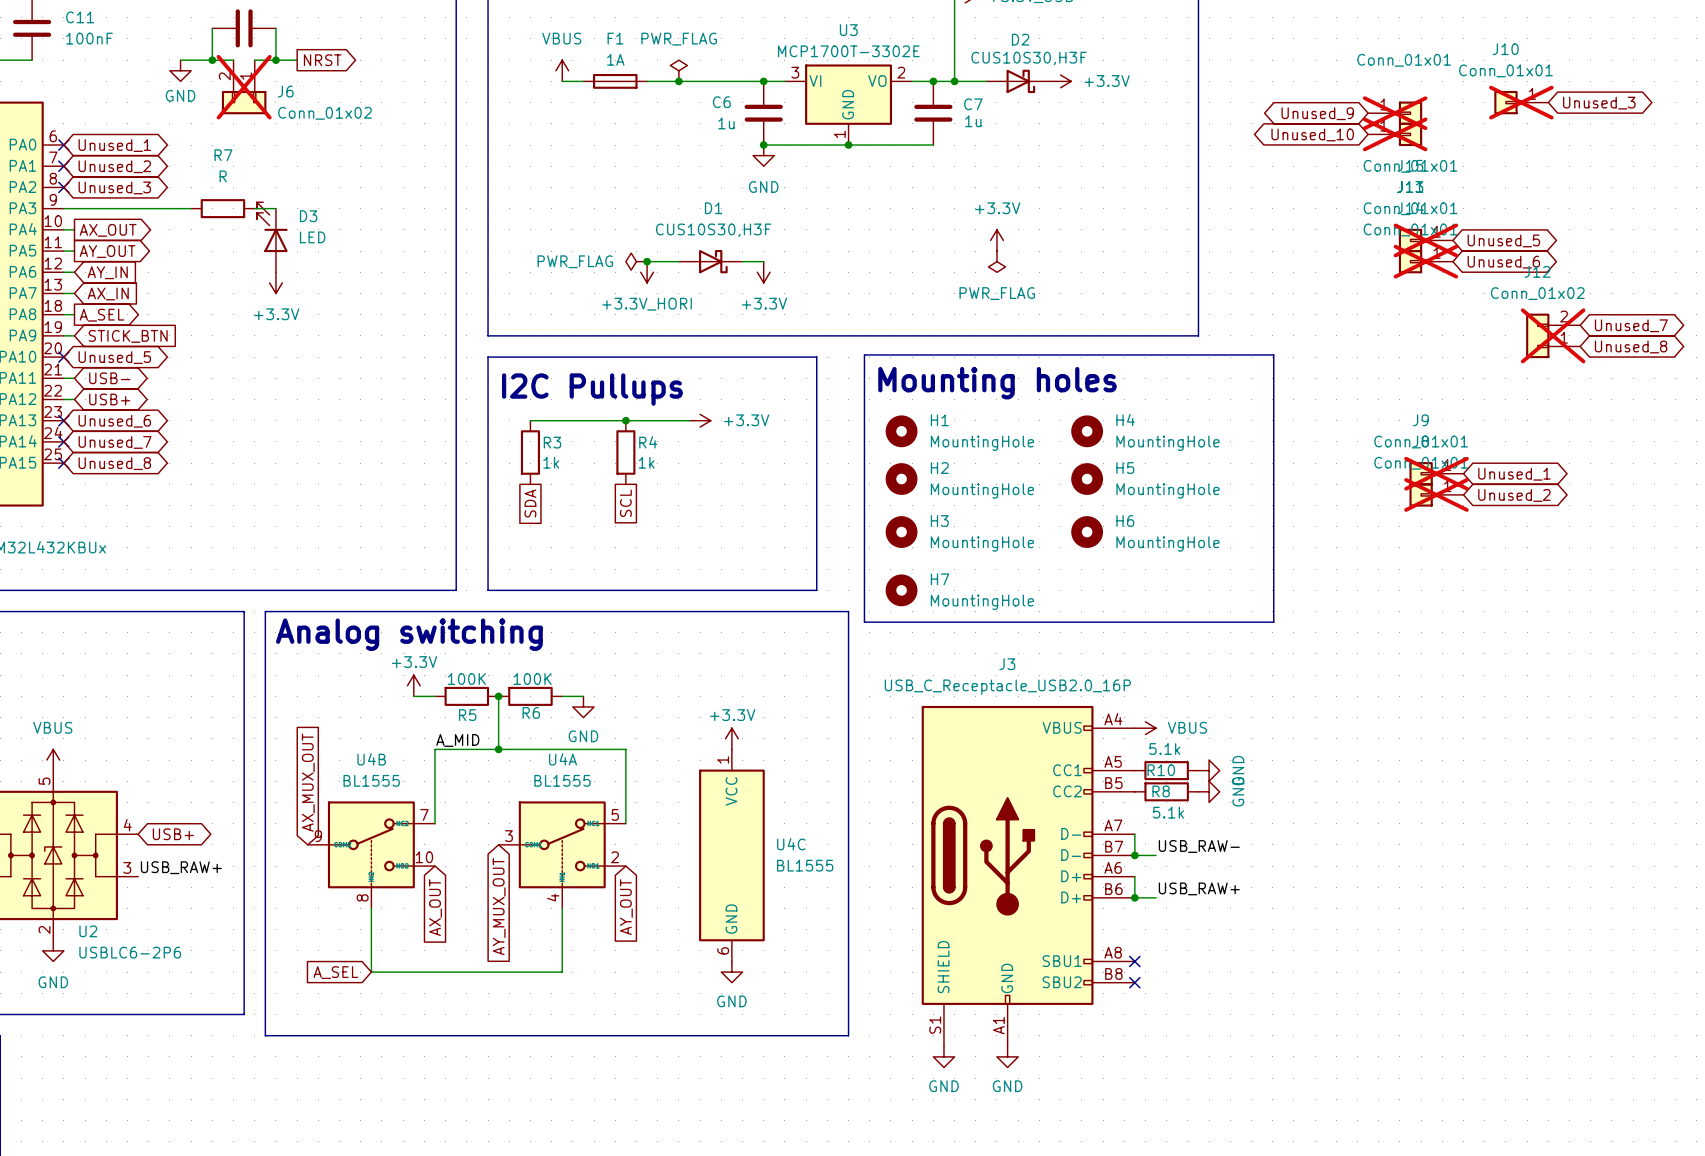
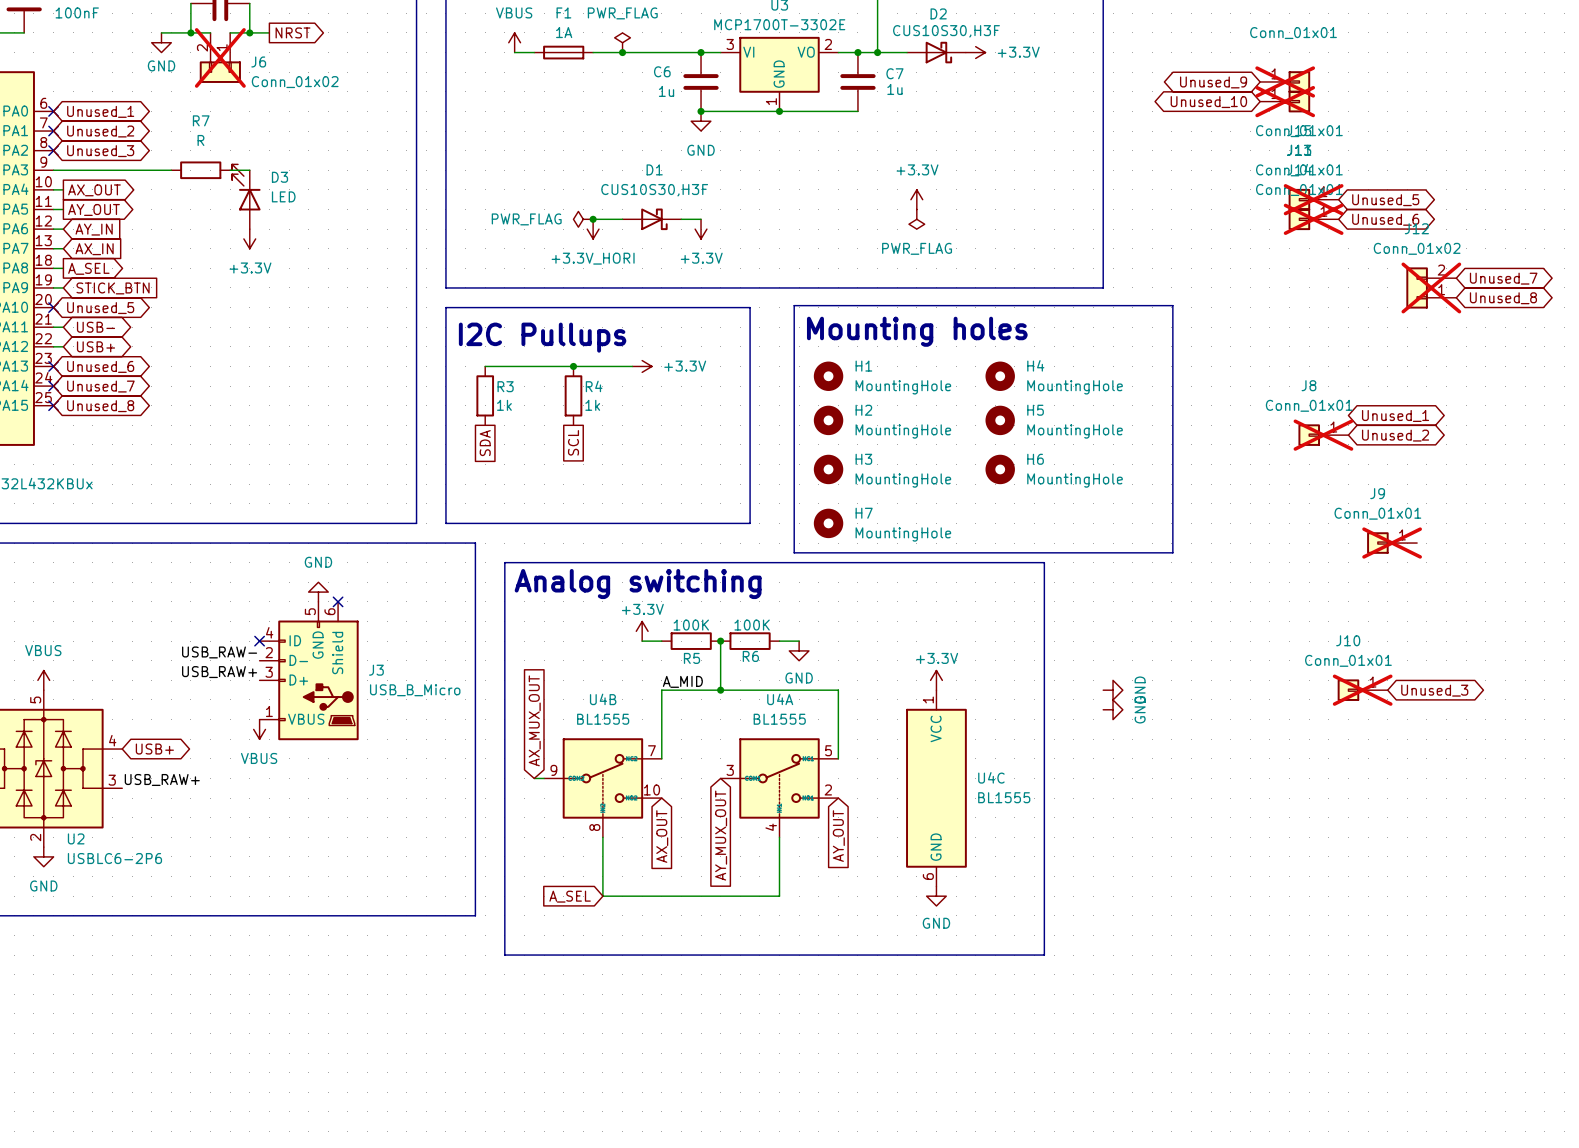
J10 position: (1521, 102) -> (1362, 690)
global label: Unused_3 (1599, 103) -> none
J9 position: (1436, 473) -> (1392, 543)
line: (244, 611) (244, 1014) -> (475, 543) (475, 915) (220, 915)
line: (265, 611) (265, 1035) (848, 1035) (848, 611) (519, 611) -> (239, 543) (220, 543)
line: none -> (504, 562) (1044, 562) (1044, 955) (504, 955) (504, 562)
text: Analog switching (409, 634) -> none
text: none -> Analog switching (638, 584)
power symbol: none -> GND (318, 592)
J3 name position: J3 (1007, 664) -> J3 (376, 670)
no-connect mark: none -> (338, 601)
power symbol: +3.3V (413, 685) -> none
J3 value: USB_C_Receptacle_USB2.0_16P (1007, 687) -> USB_B_Micro (415, 690)
wire: (413, 696) (435, 696) -> none
R5 position: (466, 696) -> (691, 641)
wire: (498, 696) (498, 749) -> none
junction: (498, 696) -> none
R6 position: (530, 696) -> (750, 641)
wire: (562, 696) (583, 696) -> (642, 641) (661, 641)
J3 symbol: [921, 705, 1135, 1047] -> [259, 601, 359, 741]
power symbol: GND (583, 707) -> none
no-connect mark: none -> (259, 641)
wire: none -> (720, 641) (720, 690)
junction: none -> (720, 641)
wire: none -> (779, 641) (799, 641)
power symbol: none -> GND (799, 650)
power symbol: VBUS (1145, 728) -> none
label: none -> USB_RAW- (219, 652)
power symbol position: +3.3V (731, 738) -> +3.3V (642, 631)
label: A_MID (457, 740) -> none
junction: (498, 749) -> none
label: none -> USB_RAW+ (219, 672)
power symbol: none -> +3.3V (936, 680)
label: none -> A_MID (682, 681)
junction: none -> (720, 690)
R10: 5.1k (1166, 770) -> none
global label: none -> Unused_3 (1434, 690)
global label: AX_MUX_OUT (308, 782) -> none
R8: 5.1k (1166, 791) -> none
global label: none -> AX_MUX_OUT (534, 720)
power symbol: none -> VBUS (259, 729)
wire: (435, 823) (435, 749) (625, 749) (625, 823) -> none
wire: (1134, 834) (1134, 855) (1156, 855) -> none
wire: none -> (661, 758) (661, 690) (838, 690) (838, 758)
label: USB_RAW- (1199, 846) -> none
U4B position: (371, 854) -> (602, 787)
U4A position: (562, 854) -> (779, 787)
U4C position: (731, 855) -> (936, 788)
junction: (1134, 855) -> none
wire: (1134, 876) (1134, 897) (1156, 897) -> none
label: USB_RAW+ (1199, 888) -> none
junction: (1134, 897) -> none
global label: AY_MUX_OUT (499, 906) -> none
global label: AX_OUT (435, 907) -> none
global label: AY_OUT (626, 907) -> none
wire: (371, 908) (371, 972) (562, 972) (562, 908) -> none
global label: none -> AY_MUX_OUT (721, 835)
global label: none -> AX_OUT (662, 836)
global label: none -> AY_OUT (838, 836)
wire: none -> (602, 837) (602, 896) (779, 896) (779, 837)
no-connect mark: (1134, 961) -> none
global label: A_SEL (335, 972) -> none
power symbol: GND (731, 972) -> none
no-connect mark: (1134, 982) -> none
global label: none -> A_SEL (570, 896)
power symbol: none -> GND (936, 896)
power symbol: GND (943, 1056) -> none
power symbol: GND (1007, 1056) -> none

